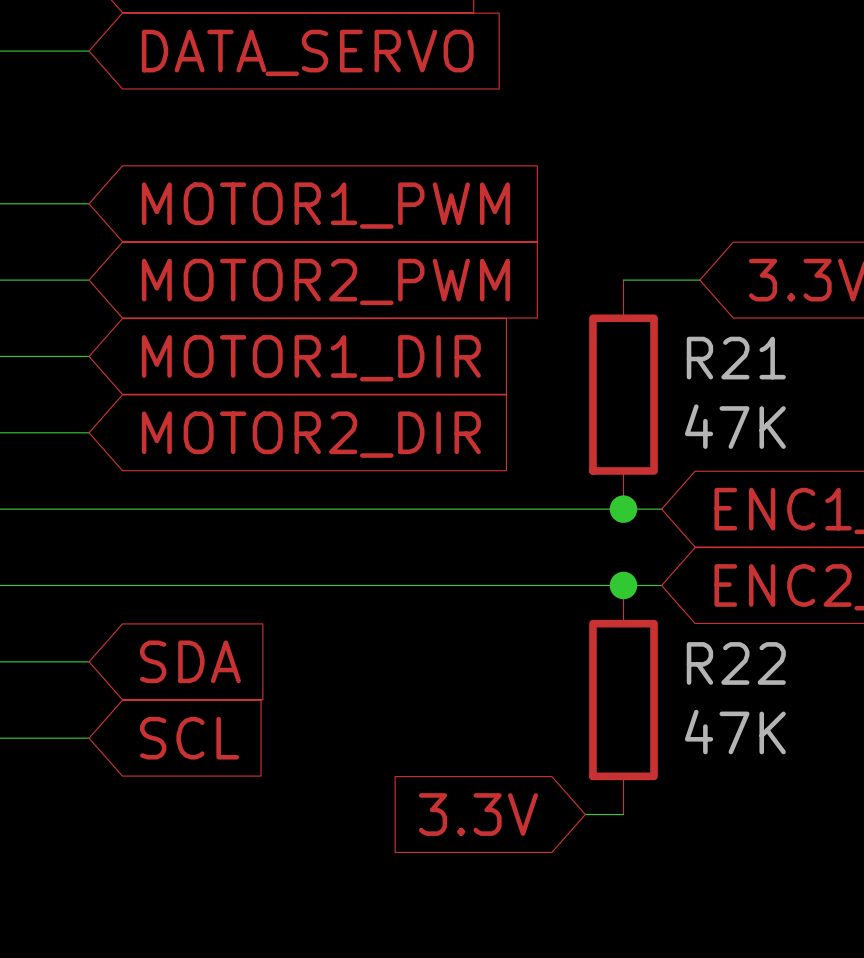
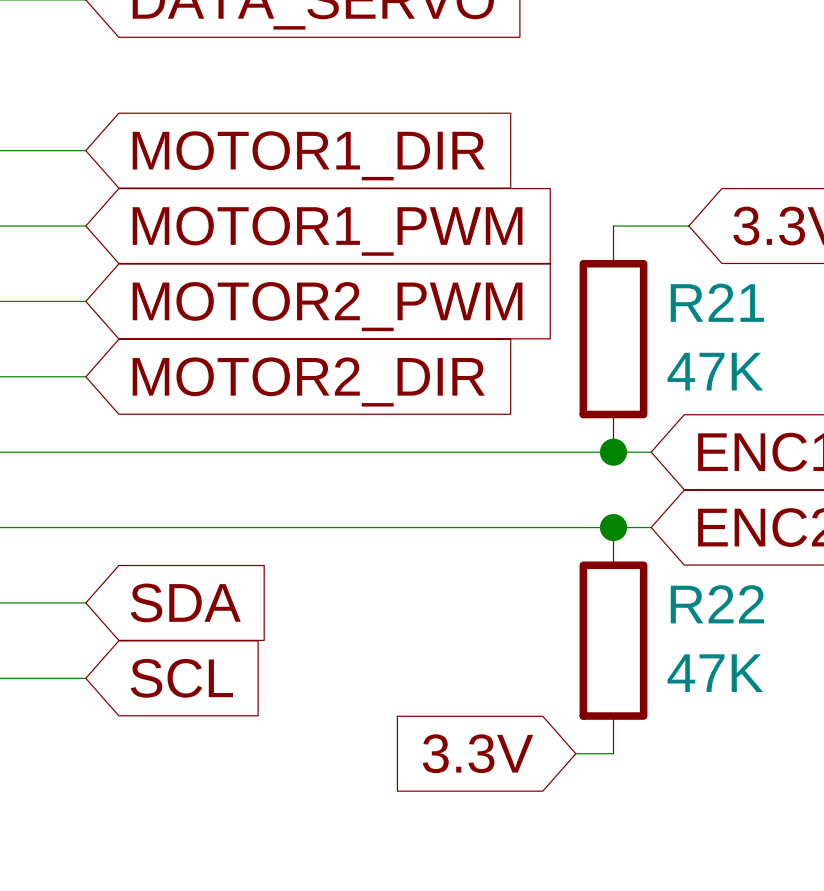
global label: MOTOR1_PWM (325, 205) -> MOTOR1_DIR (308, 155)
global label: MOTOR2_PWM (325, 281) -> MOTOR1_PWM (327, 231)
global label: MOTOR1_DIR (311, 358) -> MOTOR2_PWM (327, 306)

